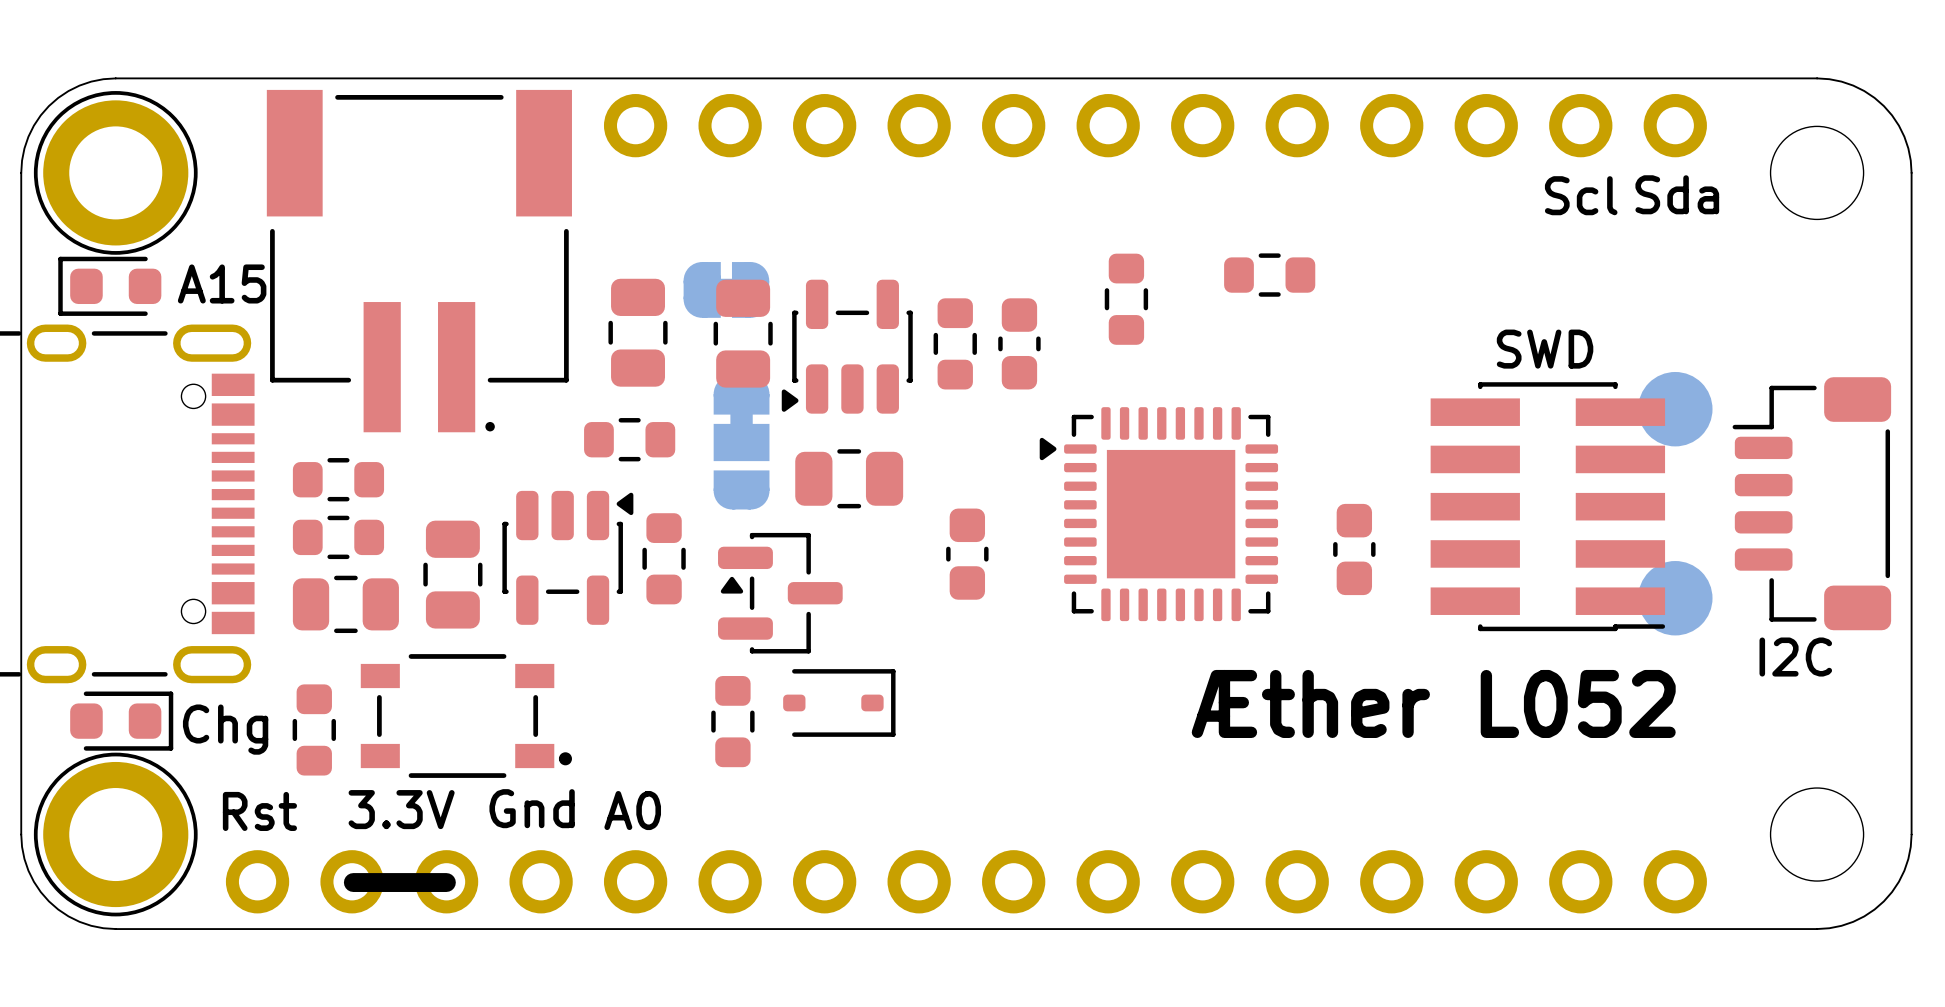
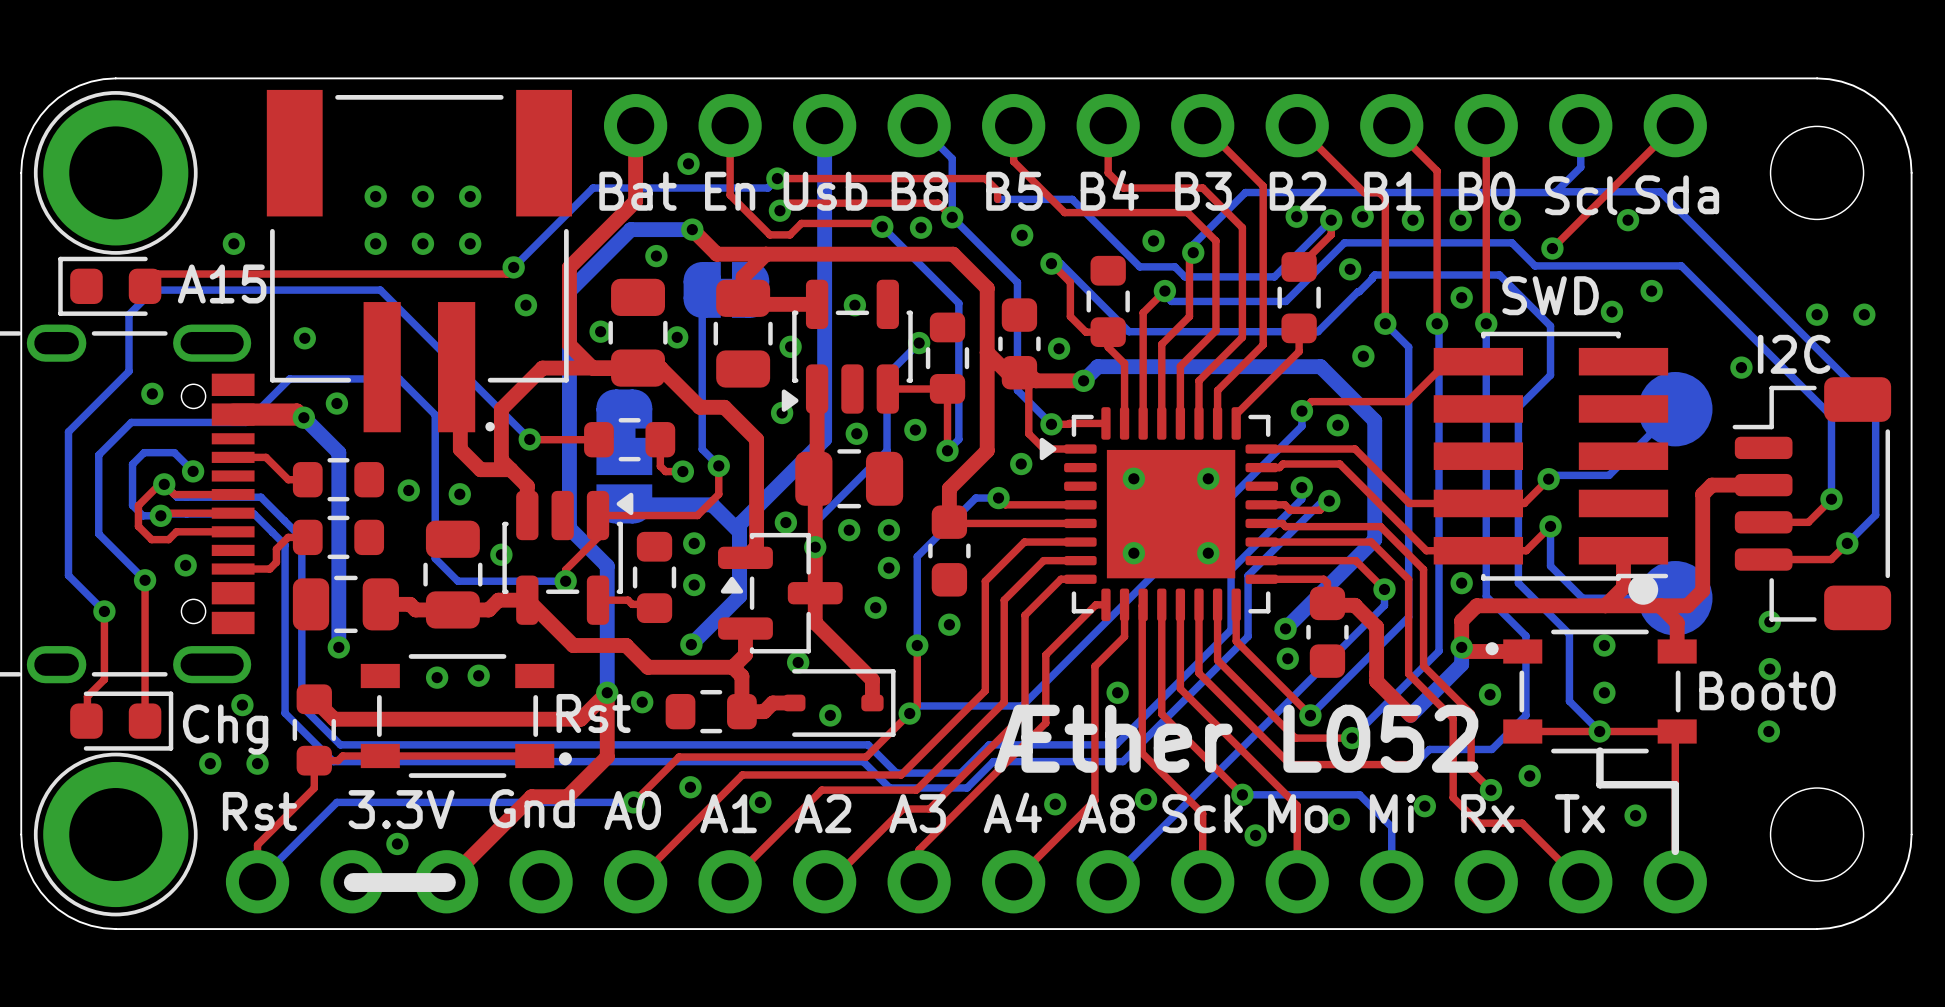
top track: none -> (635, 125) (635, 201) (569, 267) (569, 344) (592, 368)
top track: none -> (730, 125) (730, 195) (769, 234) (789, 234) (801, 223) (878, 223) (882, 226)
bottom track: none -> (824, 125) (824, 439) (739, 524) (739, 596) (691, 644)
bottom track: none -> (919, 125) (952, 158) (952, 217) (1017, 282) (1017, 390) (1051, 424)
top track: none -> (1013, 125) (1013, 161) (1064, 212) (1187, 212) (1215, 240) (1215, 330) (1180, 366) (1180, 423)
top track: none -> (1108, 125) (1108, 172) (1123, 188) (1202, 188) (1242, 227) (1242, 337) (1198, 380) (1198, 423)
top track: none -> (1202, 125) (1263, 186) (1263, 344) (1217, 390) (1217, 423)
top track: none -> (1297, 125) (1364, 192) (1379, 192) (1385, 198) (1385, 323)
top track: none -> (1391, 125) (1437, 171) (1437, 323)
top track: none -> (1486, 125) (1486, 323)
bottom track: none -> (1580, 125) (1580, 167) (1555, 192)
top track: none -> (1675, 125) (1552, 248)
via: none -> (688, 163)
top track: none -> (777, 178) (985, 178) (997, 190) (997, 199)
bottom track: none -> (777, 178) (767, 188) (593, 188) (513, 267)
via: none -> (777, 178)
text: none -> B4 (1109, 190)
text: none -> Bat (637, 191)
text: none -> En (730, 191)
text: none -> Usb (825, 191)
text: none -> B8 (919, 191)
text: none -> B5 (1014, 191)
text: none -> B3 (1203, 191)
text: none -> B2 (1298, 191)
text: none -> B1 (1392, 191)
text: none -> B0 (1487, 191)
bottom track: none -> (1555, 192) (1245, 192) (1193, 244) (1193, 252)
bottom track: none -> (1555, 192) (1660, 191) (1875, 407) (1875, 515) (1847, 543)
via: none -> (375, 196)
via: none -> (422, 196)
via: none -> (470, 196)
bottom track: none -> (997, 199) (1072, 199) (1139, 266) (1174, 266) (1184, 276) (1274, 276) (1331, 220)
top track: none -> (779, 210) (787, 203) (938, 203) (952, 217)
via: none -> (779, 210)
via: none -> (1296, 216)
via: none -> (1362, 216)
via: none -> (952, 217)
top track: none -> (1331, 220) (1331, 234) (1299, 266)
via: none -> (1331, 220)
via: none -> (1412, 220)
via: none -> (1460, 220)
via: none -> (1509, 220)
via: none -> (1628, 220)
bottom track: none -> (882, 226) (958, 303) (958, 439) (947, 450)
via: none -> (882, 226)
via: none -> (921, 227)
top track: none -> (692, 229) (716, 254) (953, 254) (987, 288) (987, 450) (949, 488) (949, 522) (1080, 523)
bottom track: none -> (692, 229) (630, 229) (569, 291) (569, 528) (607, 566) (607, 692)
via: none -> (692, 229)
via: none -> (1022, 235)
via: none -> (1153, 240)
via: none -> (233, 243)
via: none -> (375, 243)
via: none -> (422, 243)
via: none -> (470, 243)
via: none -> (1552, 248)
top track: none -> (1193, 252) (1189, 256) (1189, 316) (1161, 344) (1161, 423)
via: none -> (1193, 252)
top track: none -> (766, 254) (743, 277) (743, 298) (749, 304) (817, 304)
via: none -> (656, 256)
top track: none -> (1051, 263) (1070, 282) (1070, 316) (1085, 332) (1108, 332) (1108, 347) (1124, 363) (1124, 423)
bottom track: none -> (1051, 263) (1060, 263) (1128, 331) (1318, 331) (1374, 274) (1499, 274) (1550, 326) (1550, 375) (1518, 407) (1518, 583) (1569, 634) (1569, 701) (1599, 731)
via: none -> (1051, 263)
top track: none -> (513, 267) (507, 274) (157, 274) (145, 286)
via: none -> (513, 267)
via: none -> (1350, 269)
part rotation: 0° (1269, 275) -> 90° clockwise (1299, 297)
bottom track: none -> (702, 289) (702, 449) (718, 465)
top track: none -> (1164, 291) (1143, 312) (1143, 423)
bottom track: none -> (1164, 291) (1164, 294) (1171, 301) (1285, 301) (1344, 242) (1511, 242) (1535, 265) (1681, 265) (1831, 416) (1831, 499)
via: none -> (1164, 291)
via: none -> (1651, 291)
via: none -> (1461, 297)
part position: (1126, 299) -> (1108, 301)
via: none -> (525, 305)
via: none -> (854, 305)
via: none -> (1611, 311)
via: none -> (1817, 314)
via: none -> (1864, 314)
bottom track: none -> (1385, 323) (1408, 347) (1408, 617) (1310, 715)
via: none -> (1385, 323)
bottom track: none -> (1437, 323) (1439, 325) (1439, 651) (1352, 738)
via: none -> (1437, 323)
bottom track: none -> (1486, 323) (1486, 596) (1525, 636) (1525, 715) (1491, 749) (1429, 749) (1414, 764)
via: none -> (1486, 323)
top track: none -> (1299, 328) (1299, 351) (1236, 414) (1236, 423)
via: none -> (600, 331)
via: none -> (677, 337)
via: none -> (304, 338)
bottom track: none -> (919, 343) (887, 375) (887, 450) (817, 520) (817, 545) (815, 547)
via: none -> (919, 343)
part position: (955, 343) -> (947, 358)
via: none -> (790, 346)
via: none -> (1059, 348)
text position: SWD (1545, 349) -> SWD (1550, 295)
top track: none -> (987, 352) (1008, 373) (1028, 373) (1035, 380) (1083, 380)
via: none -> (1363, 356)
top track: none -> (1478, 361) (1447, 361) (1407, 401) (1311, 401) (1301, 411)
top track: none -> (456, 367) (460, 370) (460, 449) (480, 469) (510, 469)
via: none -> (1741, 367)
top track: none -> (817, 373) (817, 475) (813, 478) (815, 622) (872, 680) (872, 702)
top track: none -> (1026, 373) (1028, 375) (1028, 433) (1044, 449) (1080, 449)
bottom track: none -> (1083, 380) (1097, 366) (1320, 366) (1374, 420) (1374, 539) (1285, 628)
via: none -> (1083, 380)
top track: none -> (940, 388) (947, 388) (947, 450)
top track: none -> (887, 389) (940, 389)
via: none -> (152, 393)
via: none -> (336, 403)
bottom track: none -> (1675, 409) (1609, 475) (1552, 475) (1548, 479)
top track: none -> (233, 410) (297, 410) (303, 417) (233, 418)
bottom track: none -> (1301, 411) (1301, 426) (1022, 705) (917, 705)
via: none -> (1301, 411)
via: none -> (782, 412)
bottom track: none -> (303, 417) (338, 452) (338, 647)
via: none -> (303, 417)
top track: none -> (1105, 423) (1051, 424)
via: none -> (1051, 424)
via: none -> (1337, 425)
via: none -> (915, 429)
via: none -> (856, 433)
bottom track: none -> (529, 439) (380, 290) (153, 290) (128, 314) (128, 371) (68, 431) (68, 575) (104, 611)
via: none -> (529, 439)
top track: none -> (530, 439) (598, 439)
top track: none -> (660, 439) (660, 466) (665, 471) (682, 471)
part position: (741, 442) -> (624, 456)
top track: none -> (1261, 449) (1355, 449) (1409, 503) (1524, 503) (1548, 479)
via: none -> (947, 450)
top track: none -> (233, 457) (266, 457) (288, 479) (307, 479)
via: none -> (1021, 464)
top track: none -> (718, 465) (718, 494) (697, 515) (598, 515) (598, 537) (565, 569) (565, 581)
via: none -> (718, 465)
top track: none -> (1261, 467) (1279, 467) (1283, 464) (1339, 464) (1426, 550) (1526, 550) (1550, 526)
bottom track: none -> (193, 471) (174, 452) (144, 452) (132, 464) (132, 505) (142, 515) (160, 515) (162, 513) (254, 513) (285, 544) (285, 713) (333, 761) (863, 761) (889, 787) (967, 787) (993, 761) (1123, 761) (1248, 636) (1248, 575) (1322, 500) (1329, 500)
via: none -> (193, 471)
via: none -> (682, 471)
via: none -> (1133, 478)
via: none -> (1208, 478)
via: none -> (1548, 479)
bottom track: none -> (164, 484) (177, 497) (261, 497) (301, 538) (301, 706) (340, 744) (868, 744) (896, 773) (960, 773) (989, 744) (1116, 744) (1231, 629) (1231, 569) (1301, 499) (1301, 487)
via: none -> (164, 484)
top track: none -> (1767, 485) (1711, 485) (1702, 494) (1702, 590) (1687, 605) (1476, 605) (1461, 620) (1461, 647) (1465, 651) (1522, 651)
via: none -> (1301, 487)
via: none -> (408, 490)
top track: none -> (233, 494) (174, 494) (164, 484) (159, 484) (138, 505) (138, 526) (151, 539) (168, 539) (176, 531) (233, 531)
via: none -> (459, 494)
top track: none -> (998, 498) (1005, 504) (1080, 504)
bottom track: none -> (998, 498) (975, 498) (917, 556) (917, 645)
via: none -> (998, 498)
top track: none -> (1831, 499) (1808, 522) (1767, 522)
via: none -> (1831, 499)
top track: none -> (1329, 500) (1319, 510) (1290, 510) (1284, 504) (1261, 504)
via: none -> (1329, 500)
bottom track: none -> (624, 504) (712, 504) (739, 532)
part position: (1547, 506) -> (1550, 456)
top track: none -> (233, 513) (163, 513) (160, 515)
via: none -> (160, 515)
top track: none -> (527, 515) (527, 486) (501, 460) (501, 409) (542, 368) (660, 368) (699, 407) (724, 407) (756, 439) (756, 546) (745, 557)
via: none -> (785, 522)
top track: none -> (1261, 523) (1282, 523) (1285, 526) (1380, 526) (1423, 569) (1423, 665) (1471, 713) (1471, 770) (1490, 790)
bottom track: none -> (1550, 526) (1550, 566) (1582, 598) (1675, 598)
via: none -> (1550, 526)
via: none -> (849, 530)
via: none -> (888, 530)
top track: none -> (307, 537) (288, 537) (276, 549) (276, 562) (269, 569) (233, 569)
top track: none -> (1080, 542) (1024, 542) (985, 581) (985, 690) (901, 774) (742, 774) (635, 881)
top track: none -> (1261, 542) (1371, 542) (1408, 579) (1408, 674) (1453, 718) (1453, 797) (1478, 823) (1522, 823) (1580, 881)
via: none -> (694, 543)
top track: none -> (1847, 543) (1831, 559) (1767, 559)
via: none -> (1847, 543)
via: none -> (815, 547)
part position: (1354, 549) -> (1327, 632)
top track: none -> (1623, 550) (1623, 587) (1605, 605)
via: none -> (1133, 553)
via: none -> (1208, 553)
via: none -> (501, 554)
part position: (967, 554) -> (949, 550)
part position: (664, 558) -> (654, 577)
top track: none -> (1080, 560) (1043, 560) (1004, 600) (1004, 702) (916, 790) (821, 790) (730, 881)
top track: none -> (1261, 560) (1355, 560) (1384, 589)
via: none -> (185, 565)
via: none -> (888, 567)
drawing: none -> [1628, 574, 1659, 605]
top track: none -> (1080, 579) (1061, 579) (1025, 615) (1025, 713) (929, 809) (903, 809) (830, 881) (824, 881)
top track: none -> (1261, 579) (1323, 579) (1327, 582) (1327, 603) (1329, 605) (1354, 605) (1376, 627) (1376, 681) (1410, 715)
top track: none -> (145, 580) (145, 721)
bottom track: none -> (145, 580) (98, 533) (98, 455) (131, 422) (246, 422) (289, 378) (399, 378) (435, 414) (435, 558) (457, 581) (565, 581)
via: none -> (145, 580)
via: none -> (565, 581)
via: none -> (1461, 583)
via: none -> (694, 585)
bottom track: none -> (1384, 589) (1384, 605) (1108, 881)
via: none -> (1384, 589)
top track: none -> (598, 600) (627, 600) (632, 604) (650, 604) (654, 608)
top track: none -> (380, 604) (410, 604) (415, 609) (488, 609) (498, 600) (527, 600) (573, 645) (626, 645) (647, 667) (732, 667)
top track: none -> (1105, 604) (1095, 604) (1045, 654) (1045, 722) (919, 849) (919, 881)
top track: none -> (1124, 604) (1124, 636) (1094, 666) (1094, 800) (1013, 881)
top track: none -> (1143, 604) (1142, 753) (1202, 813) (1202, 881)
top track: none -> (1161, 604) (1161, 714) (1242, 794)
top track: none -> (1180, 604) (1180, 688) (1297, 805) (1297, 881)
top track: none -> (1198, 604) (1198, 673) (1290, 764) (1414, 764)
top track: none -> (1217, 604) (1217, 660) (1295, 738) (1352, 738)
top track: none -> (1236, 604) (1236, 641) (1310, 715)
top track: none -> (1660, 605) (1677, 622) (1677, 651)
via: none -> (875, 607)
top track: none -> (104, 611) (104, 679) (87, 696) (86, 721)
via: none -> (104, 611)
via: none -> (1769, 621)
via: none -> (949, 624)
top track: none -> (745, 628) (745, 654) (732, 667)
via: none -> (1285, 628)
via: none -> (691, 644)
top track: none -> (917, 645) (917, 705) (866, 757) (679, 757) (633, 802)
via: none -> (917, 645)
via: none -> (1604, 645)
via: none -> (338, 647)
bottom track: none -> (1461, 647) (1461, 664) (1410, 715)
via: none -> (1461, 647)
text position: I2C (1795, 657) -> I2C (1794, 354)
via: none -> (1287, 658)
via: none -> (798, 662)
top track: none -> (732, 667) (741, 676) (741, 711) (764, 711) (772, 702) (794, 702)
via: none -> (1769, 669)
via: none -> (478, 675)
via: none -> (437, 677)
text: none -> Boot0 (1767, 690)
part: none -> (1591, 691)
via: none -> (607, 692)
via: none -> (1117, 692)
via: none -> (1604, 692)
via: none -> (1490, 694)
top track: none -> (314, 699) (334, 719) (580, 719) (607, 692) (607, 757) (567, 796) (531, 796) (446, 881) (352, 881)
via: none -> (642, 702)
text position: Æther L052 (1433, 703) -> Æther L052 (1236, 738)
via: none -> (242, 705)
text: none -> Rst (593, 713)
via: none -> (909, 713)
via: none -> (830, 715)
via: none -> (1310, 715)
part rotation: 0° (732, 721) -> 90° clockwise (711, 711)
top track: none -> (1522, 731) (1677, 731) (1675, 733) (1675, 881)
via: none -> (1599, 731)
via: none -> (1768, 731)
via: none -> (1352, 738)
line: none -> (1599, 751) (1599, 784) (1675, 784) (1675, 851)
top track: none -> (534, 756) (342, 756) (338, 760) (314, 760) (314, 788) (257, 844) (257, 881)
via: none -> (210, 763)
via: none -> (257, 763)
via: none -> (1529, 775)
via: none -> (690, 787)
via: none -> (1490, 790)
bottom track: none -> (1242, 794) (1359, 794) (1391, 826) (1391, 881)
via: none -> (1242, 794)
via: none -> (1146, 799)
bottom track: none -> (633, 802) (336, 802) (257, 881)
via: none -> (633, 802)
via: none -> (760, 802)
via: none -> (1055, 804)
via: none -> (1424, 806)
text: none -> A4 (1012, 812)
text: none -> A1 (728, 813)
text: none -> A2 (823, 813)
text: none -> A3 (917, 813)
text: none -> A8 (1106, 813)
text: none -> Sck (1202, 813)
text: none -> Mo (1298, 813)
text: none -> Mi (1392, 813)
text: none -> Rx (1487, 813)
text: none -> Tx (1579, 813)
via: none -> (1635, 815)
via: none -> (1338, 819)
via: none -> (1255, 835)
via: none -> (397, 843)

